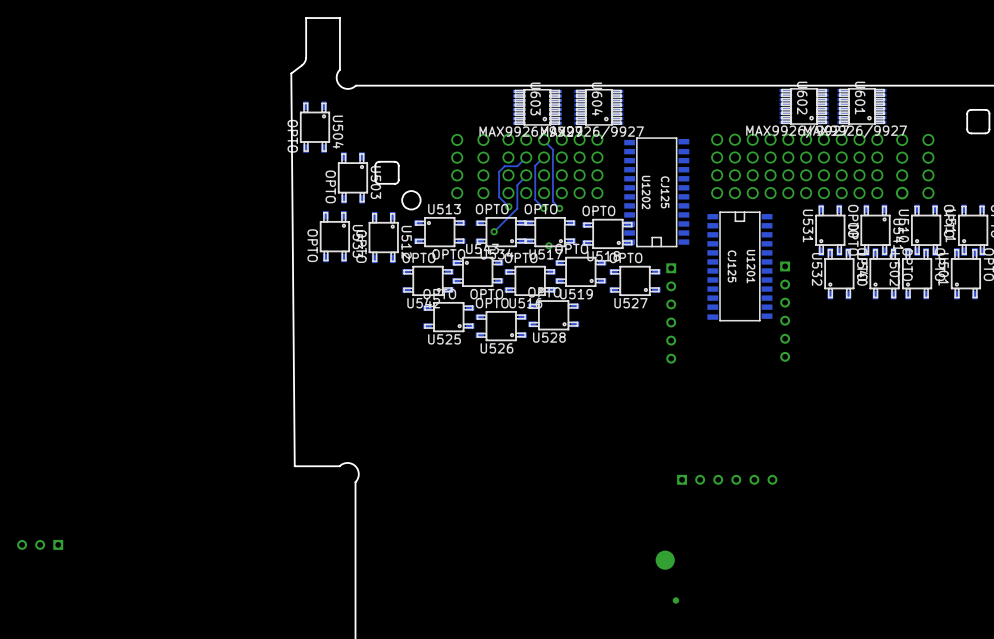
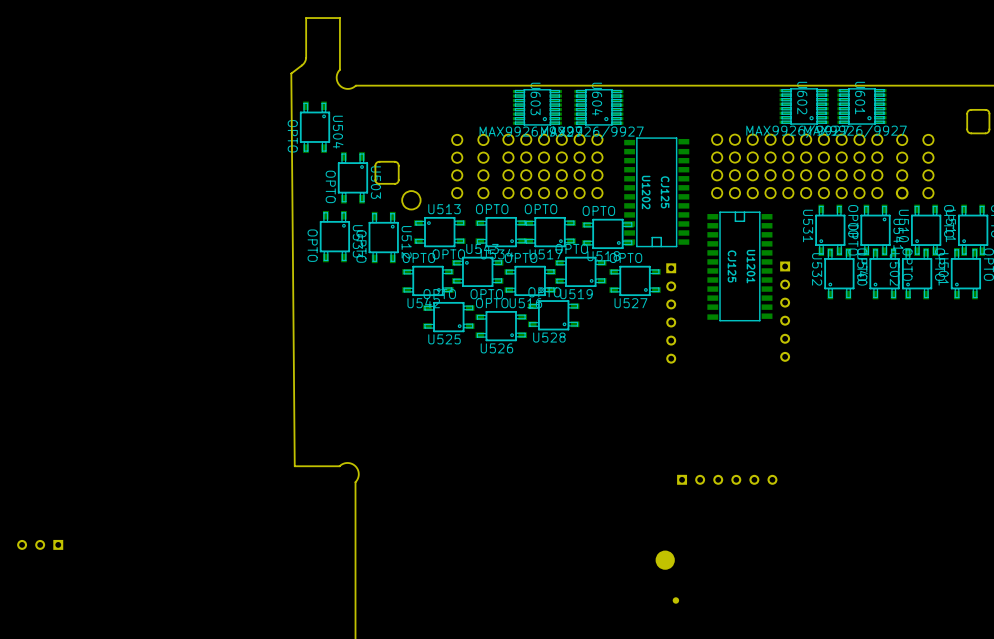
track: (544, 139) (552, 149) (552, 201) (559, 208) -> none
track: (526, 157) (517, 166) (504, 166) (499, 171) (499, 197) (508, 206) -> none
track: (544, 157) (535, 165) (535, 199) (543, 208) -> none
track: (526, 175) (517, 185) (517, 208) (494, 231) -> none
via: (508, 206) -> none
via: (543, 208) -> none
via: (559, 208) -> none
via: (494, 231) -> none
via: (548, 245) -> none

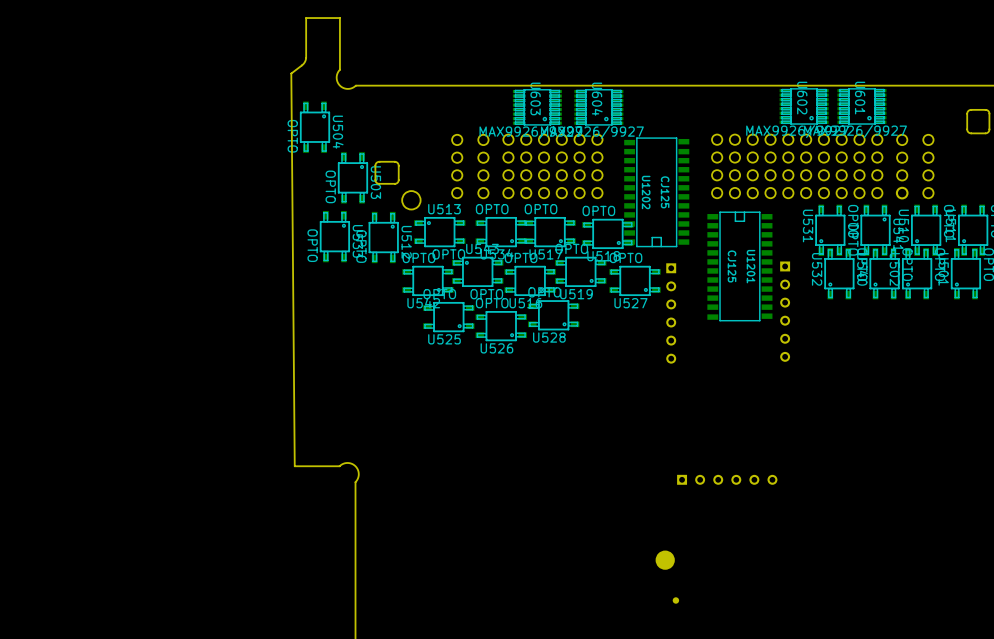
part: (40, 544) -> none

